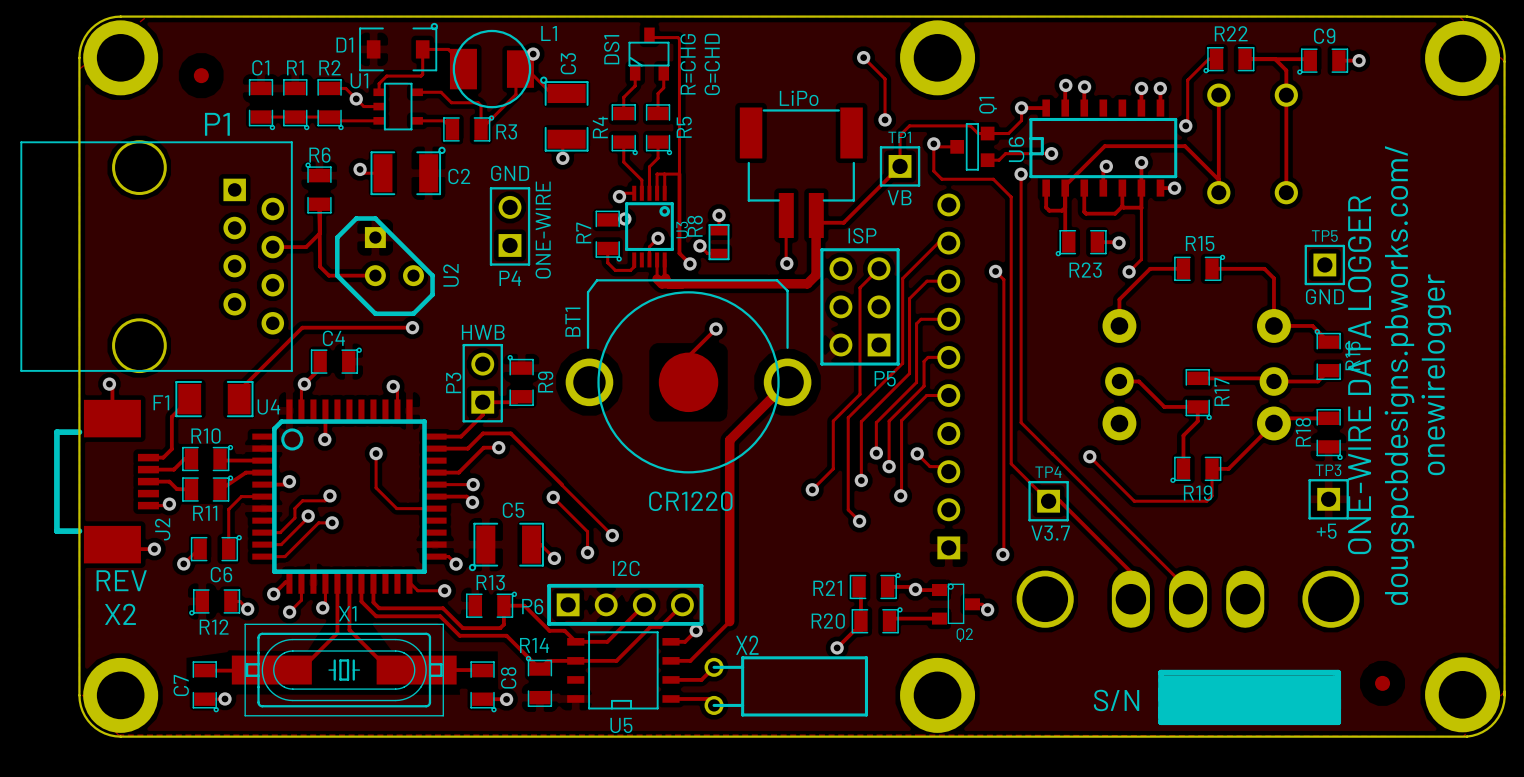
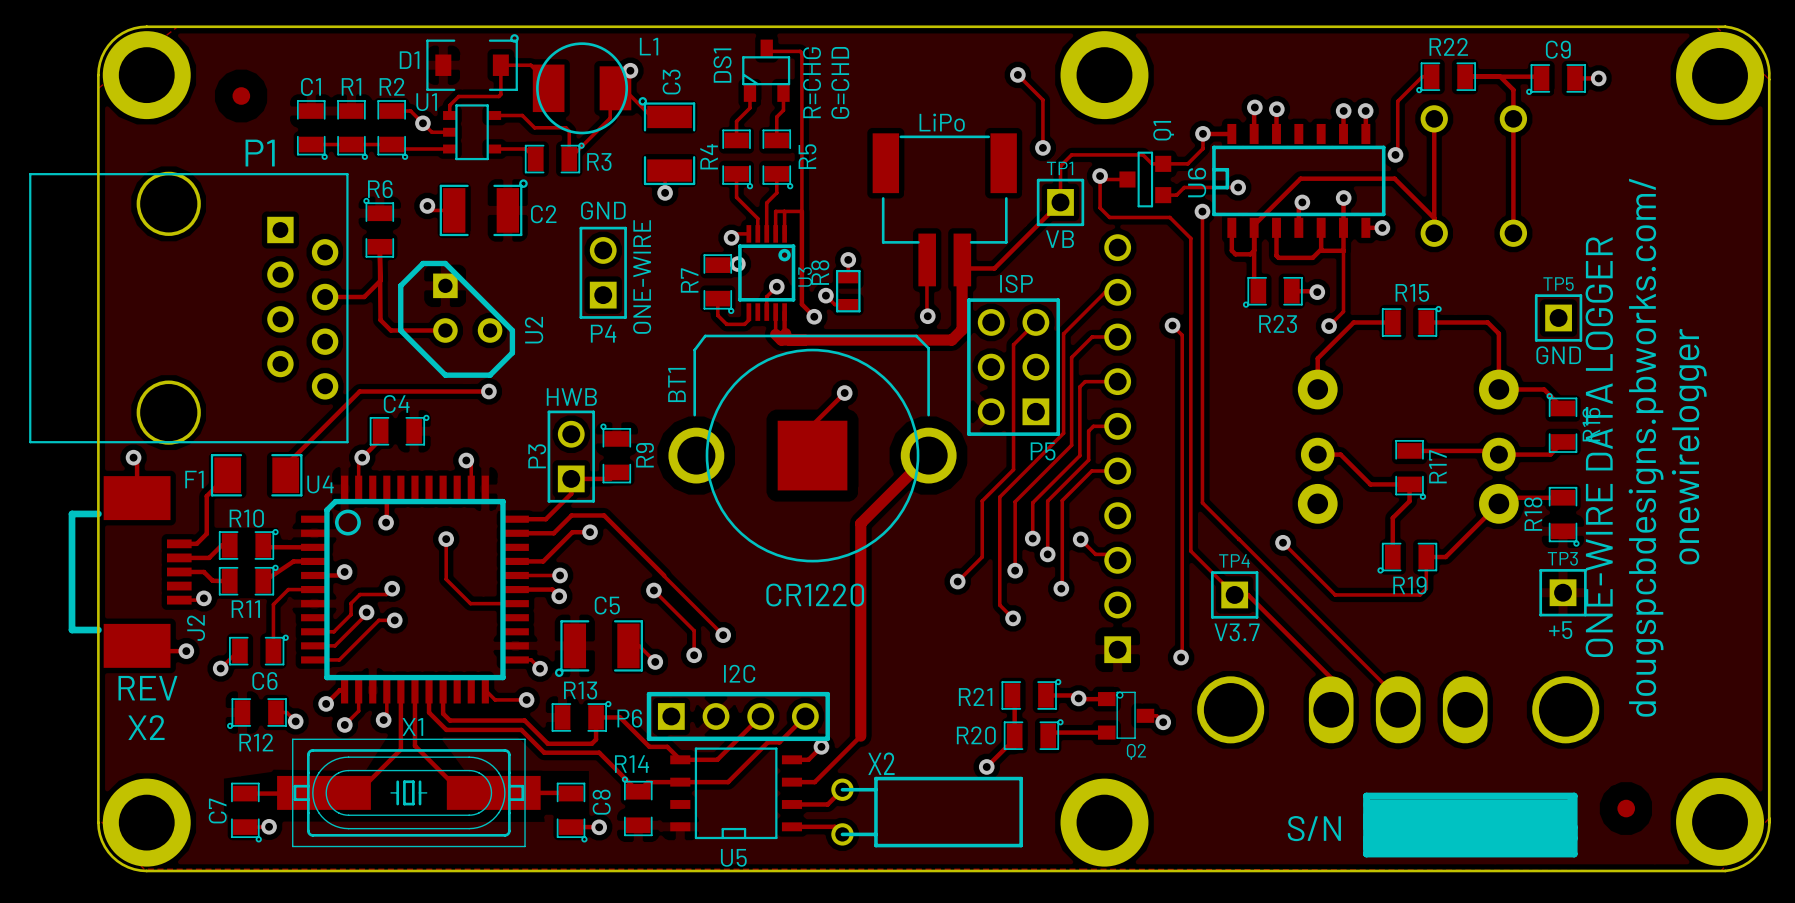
BT1 footprint: [565, 279, 812, 474] -> [668, 334, 957, 563]

